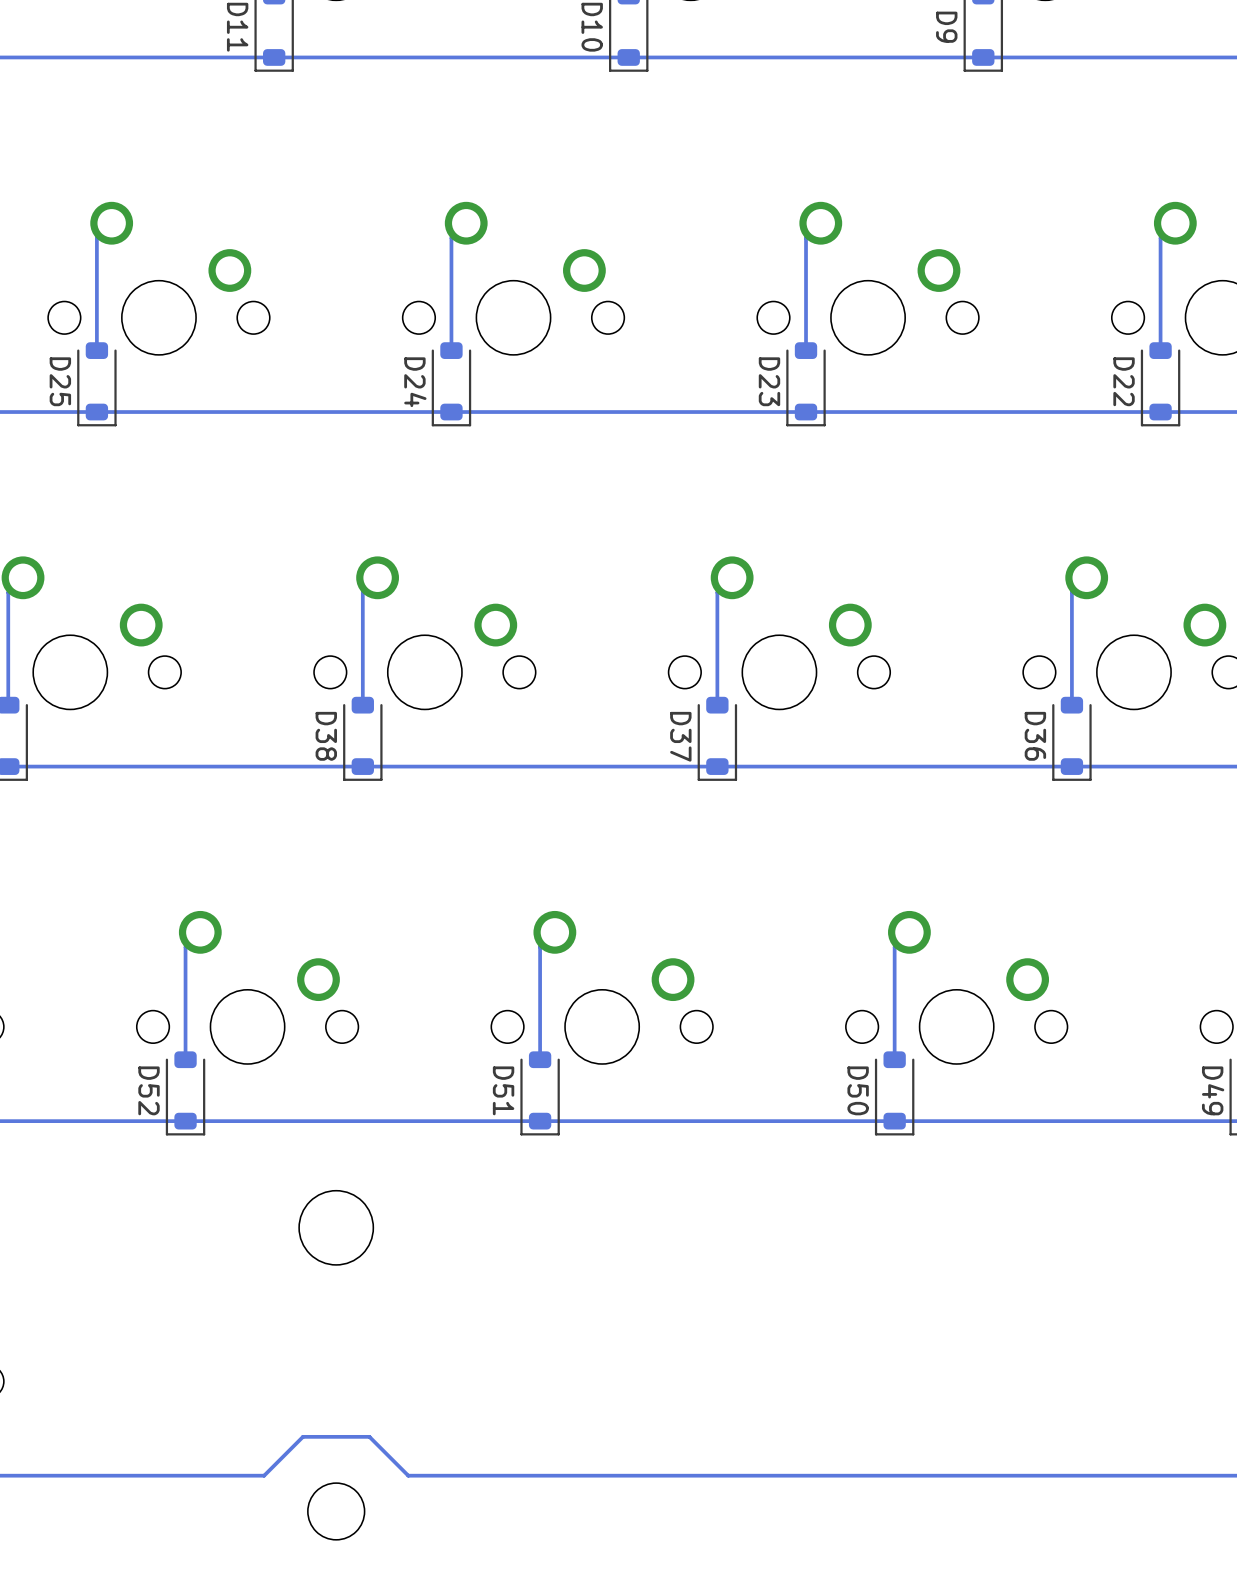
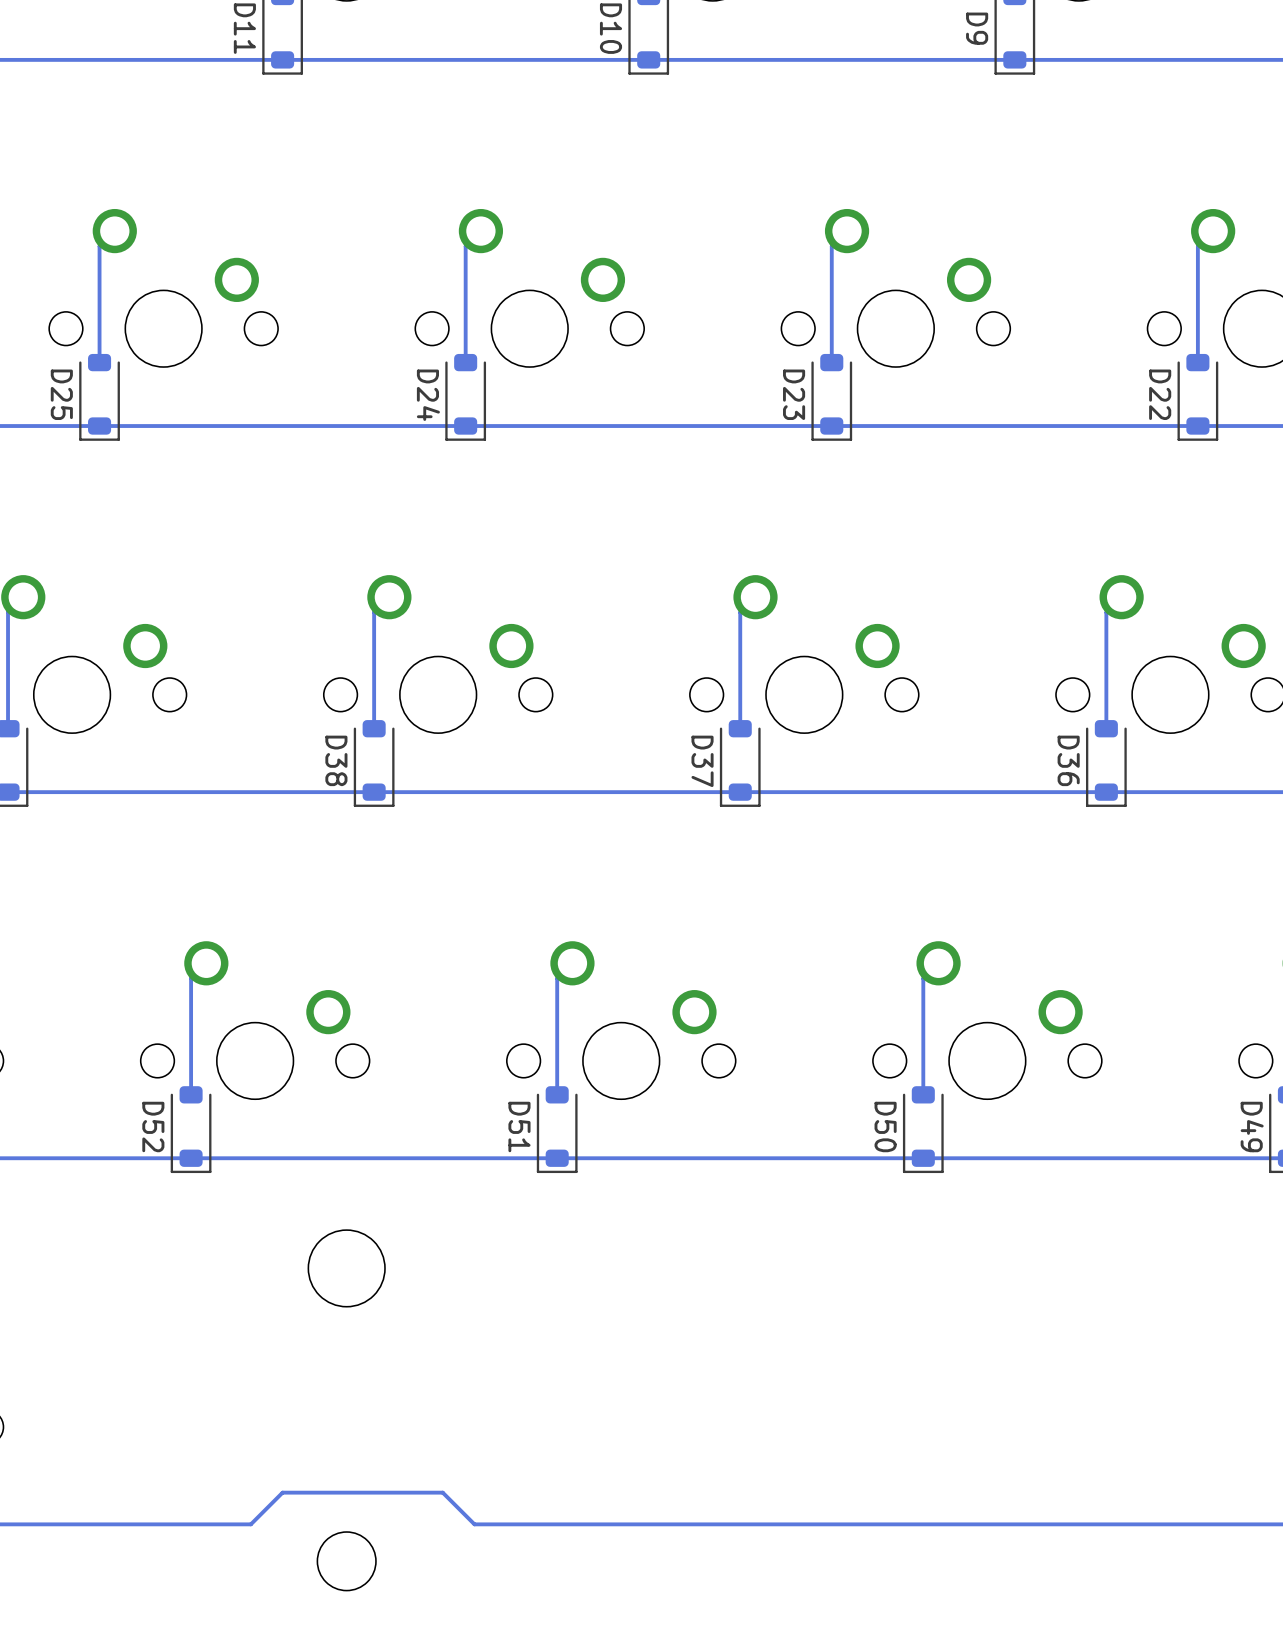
track: (460, 1475) (408, 1475) (369, 1436) (302, 1436) (264, 1475) (243, 1475) -> (474, 1524) (442, 1492) (282, 1492) (250, 1524)

